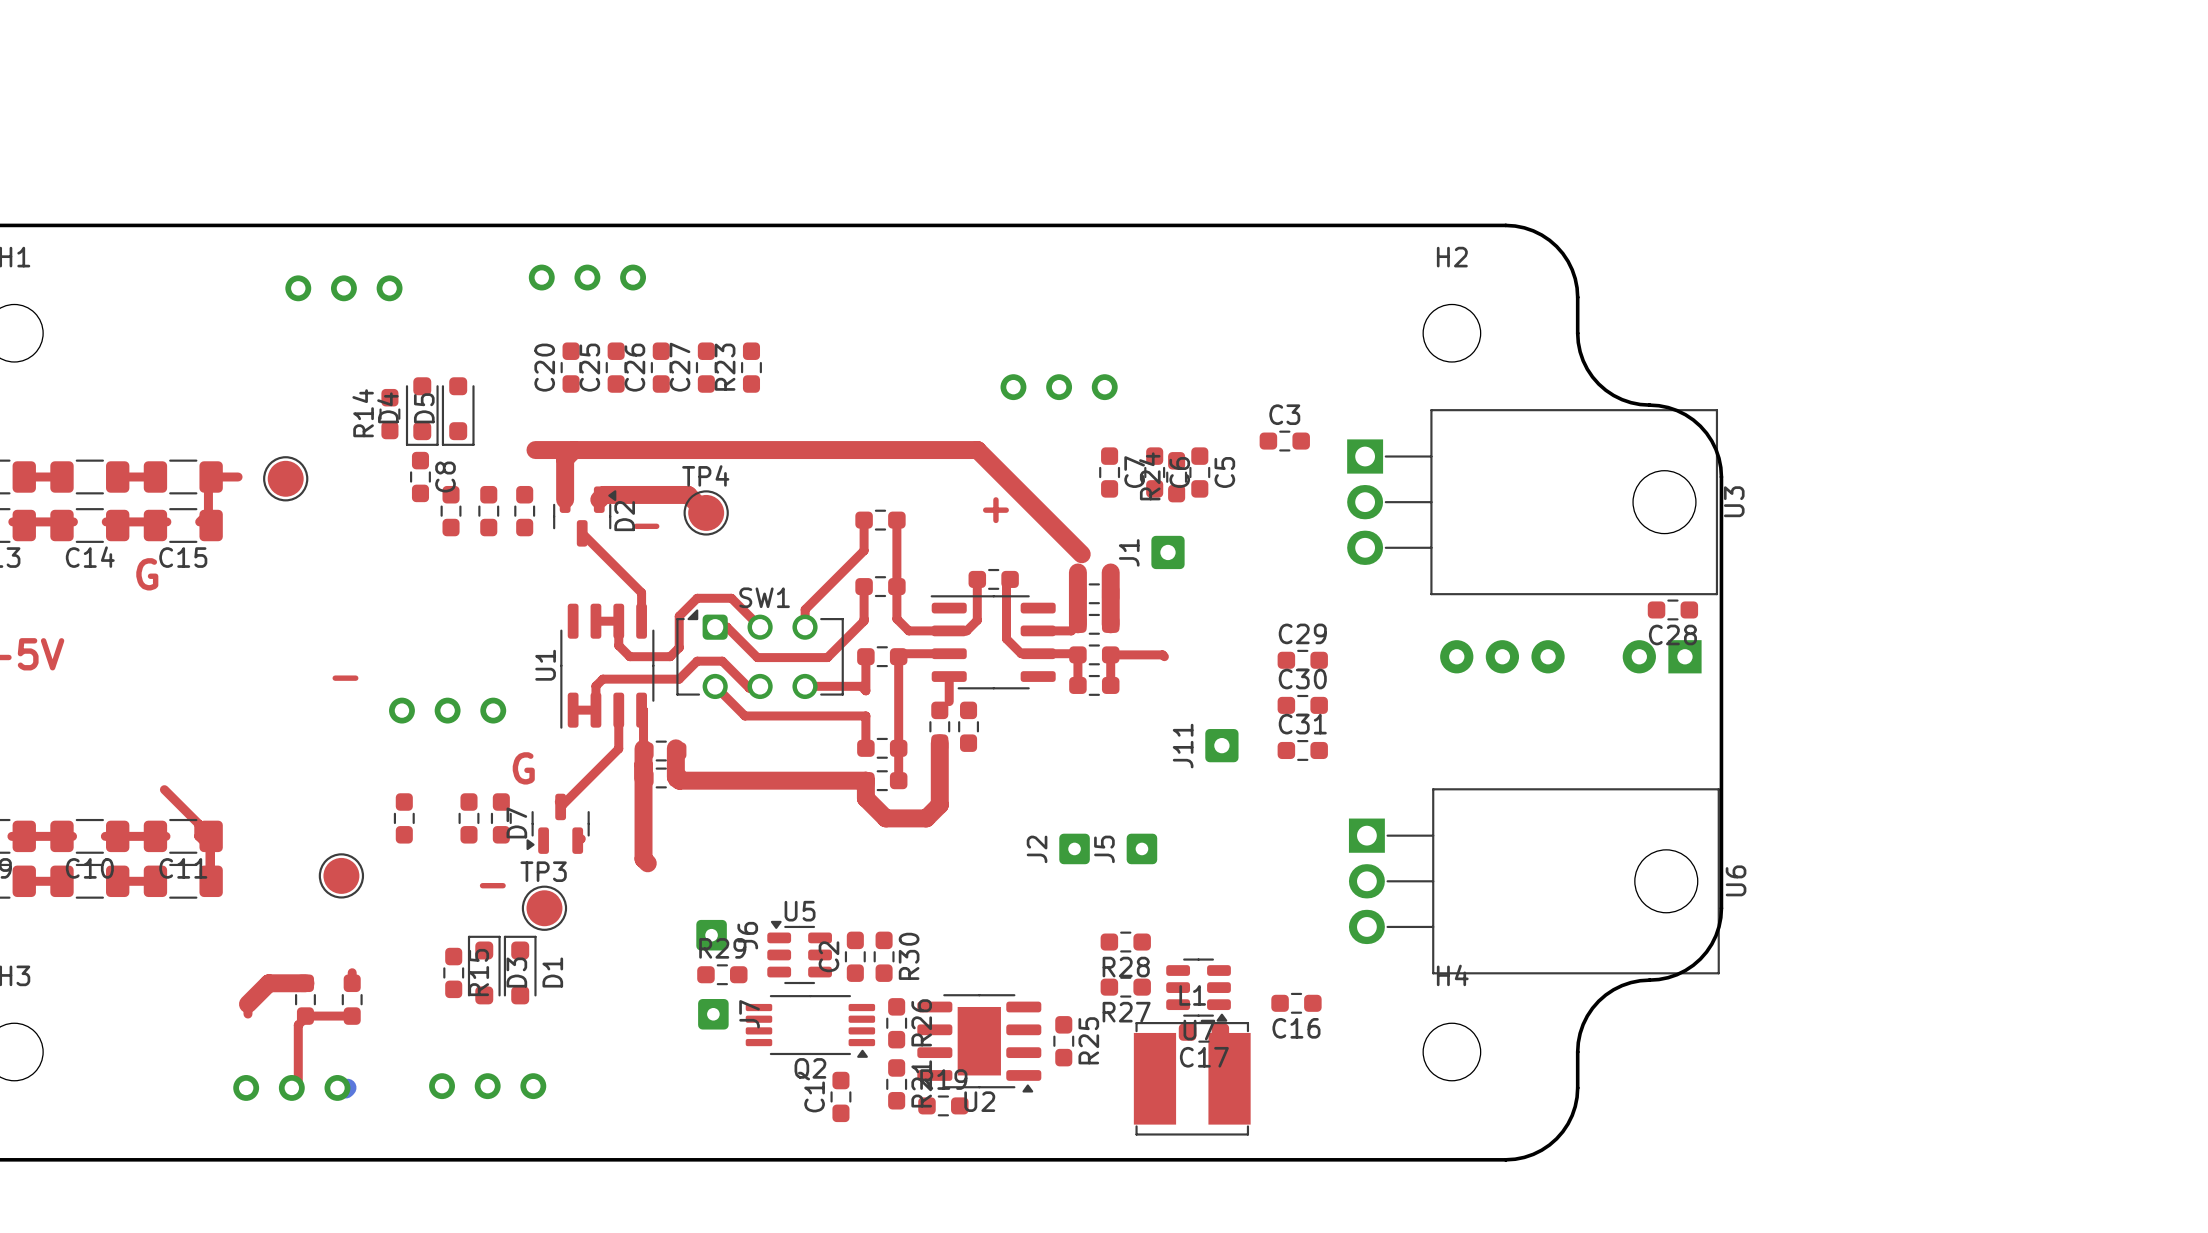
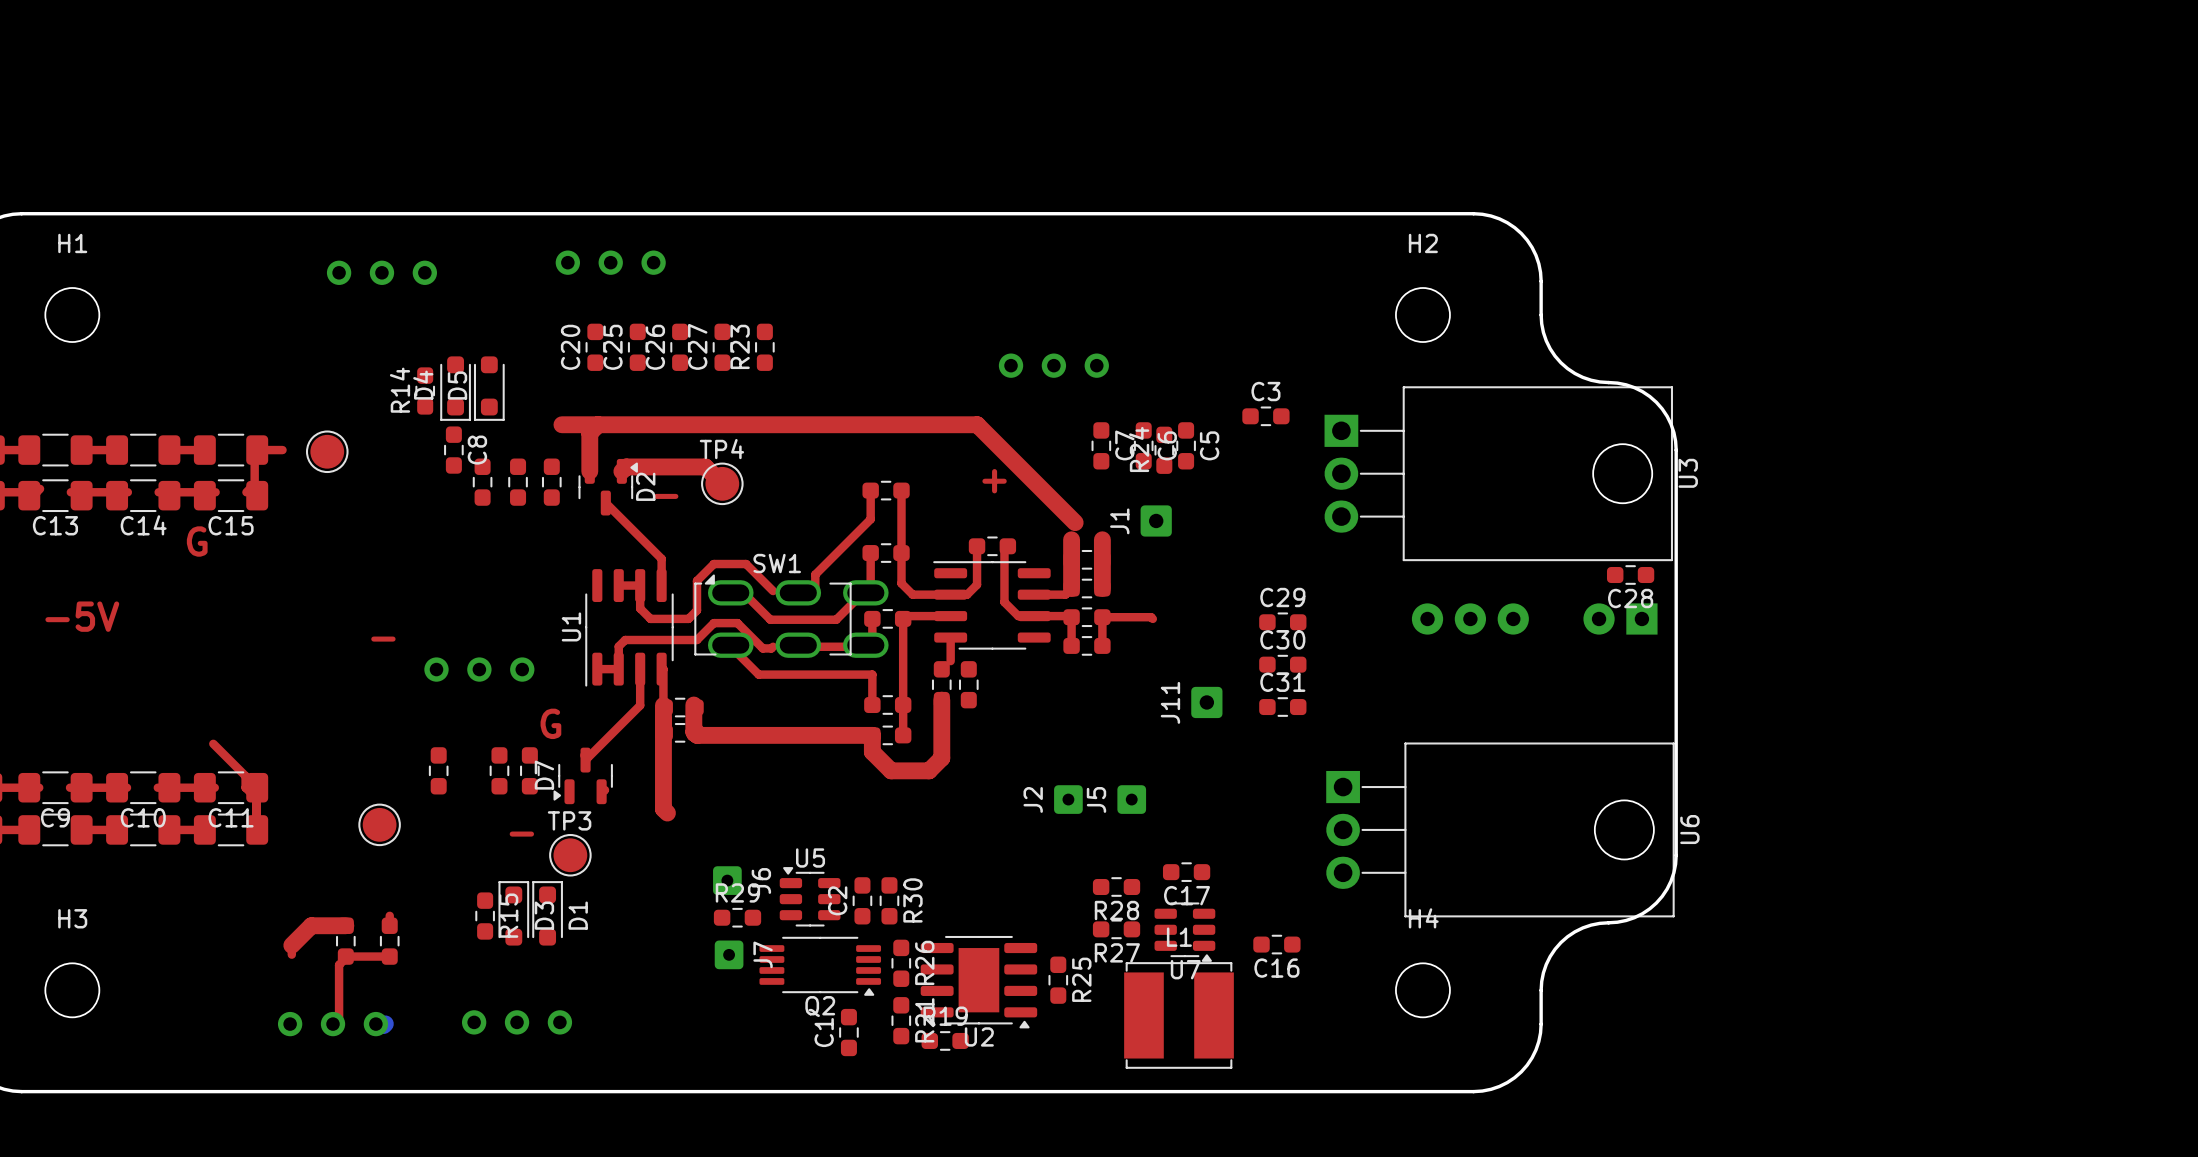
SW1 footprint: [676, 609, 844, 700] -> [694, 574, 889, 658]
C17 position: (1203, 1032) -> (1186, 872)

